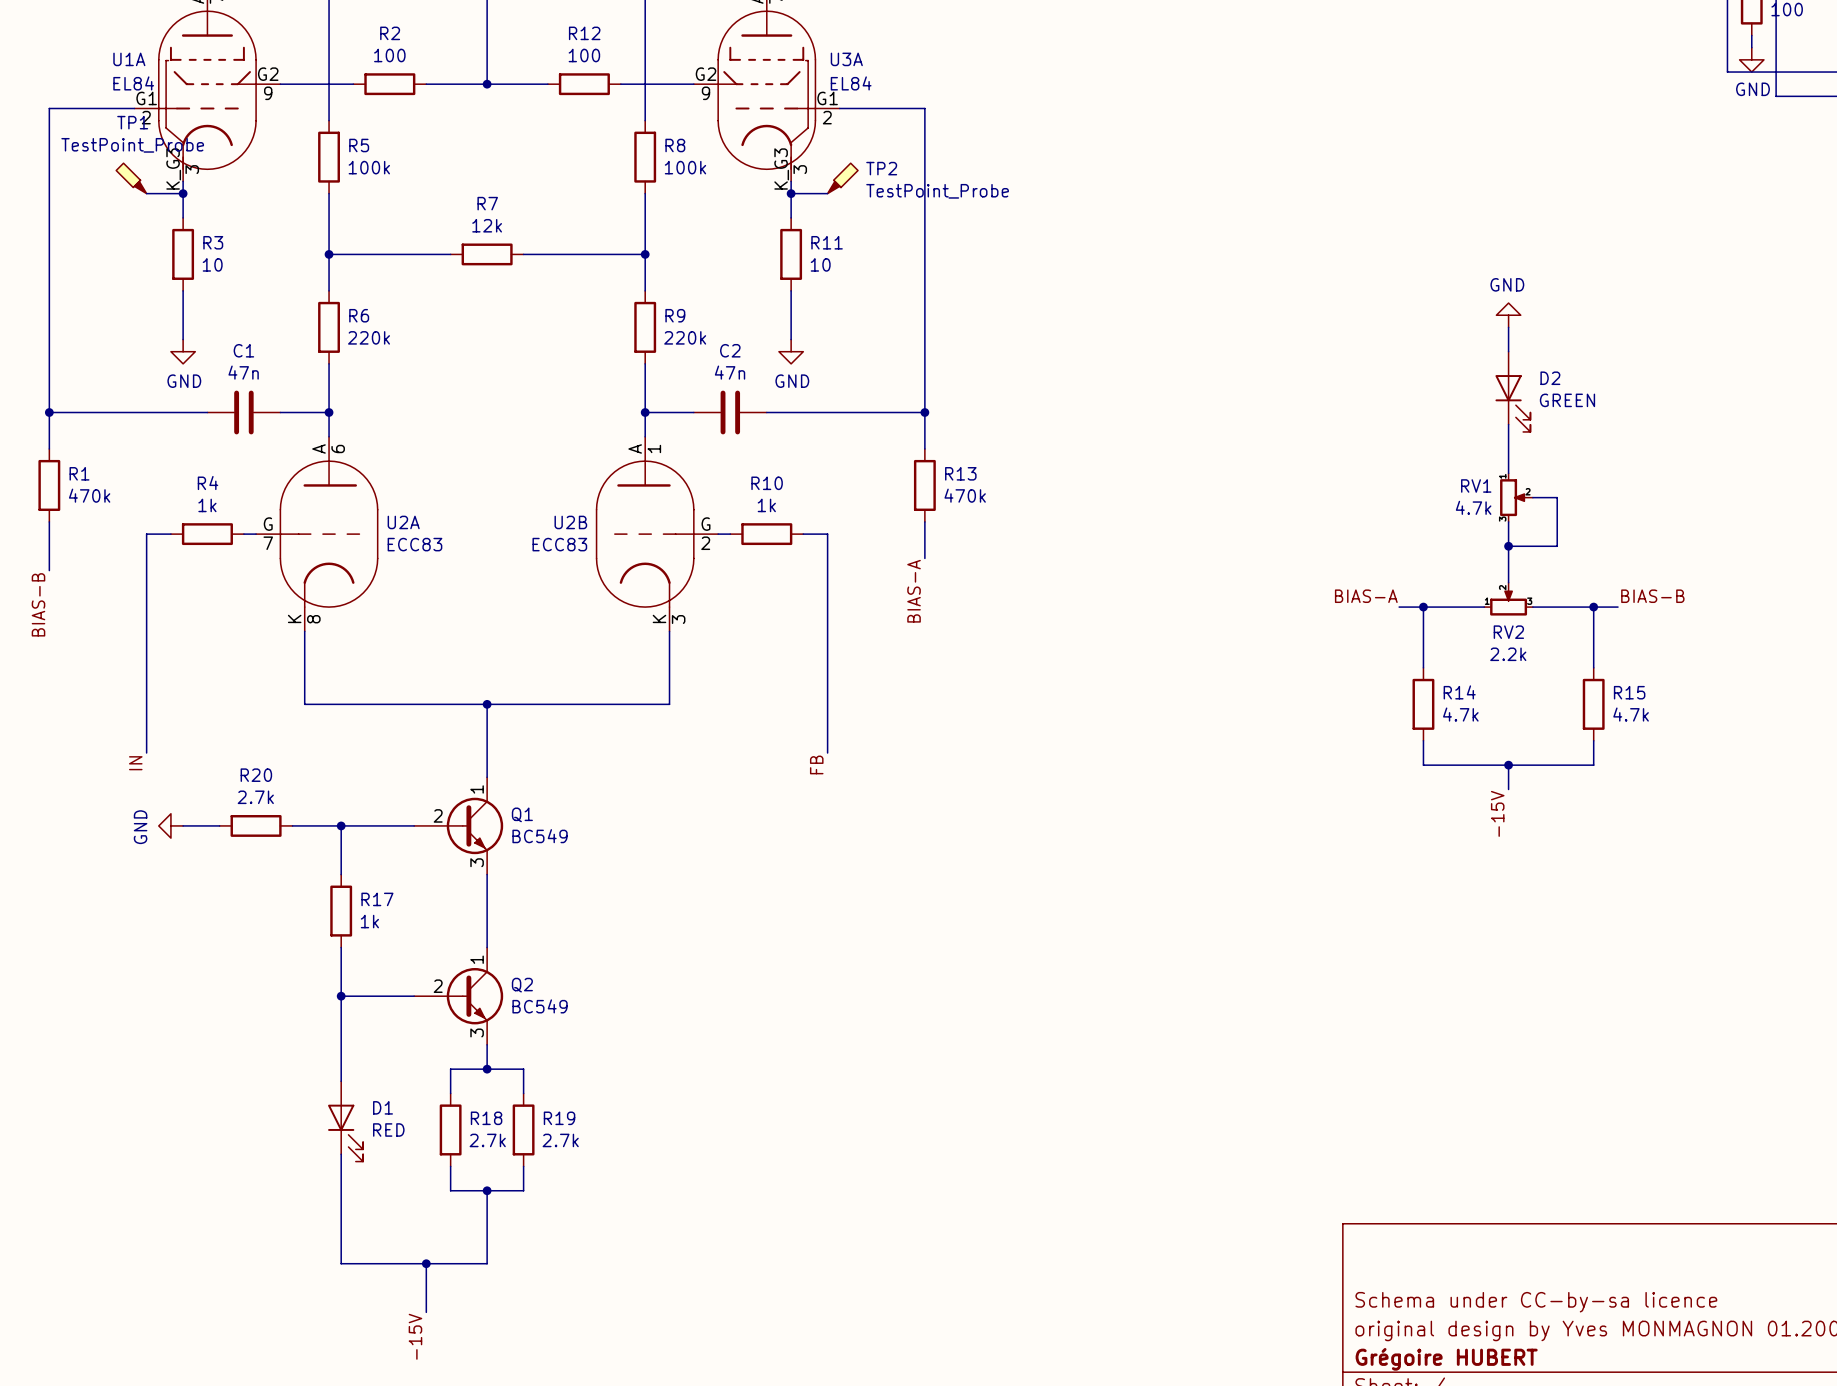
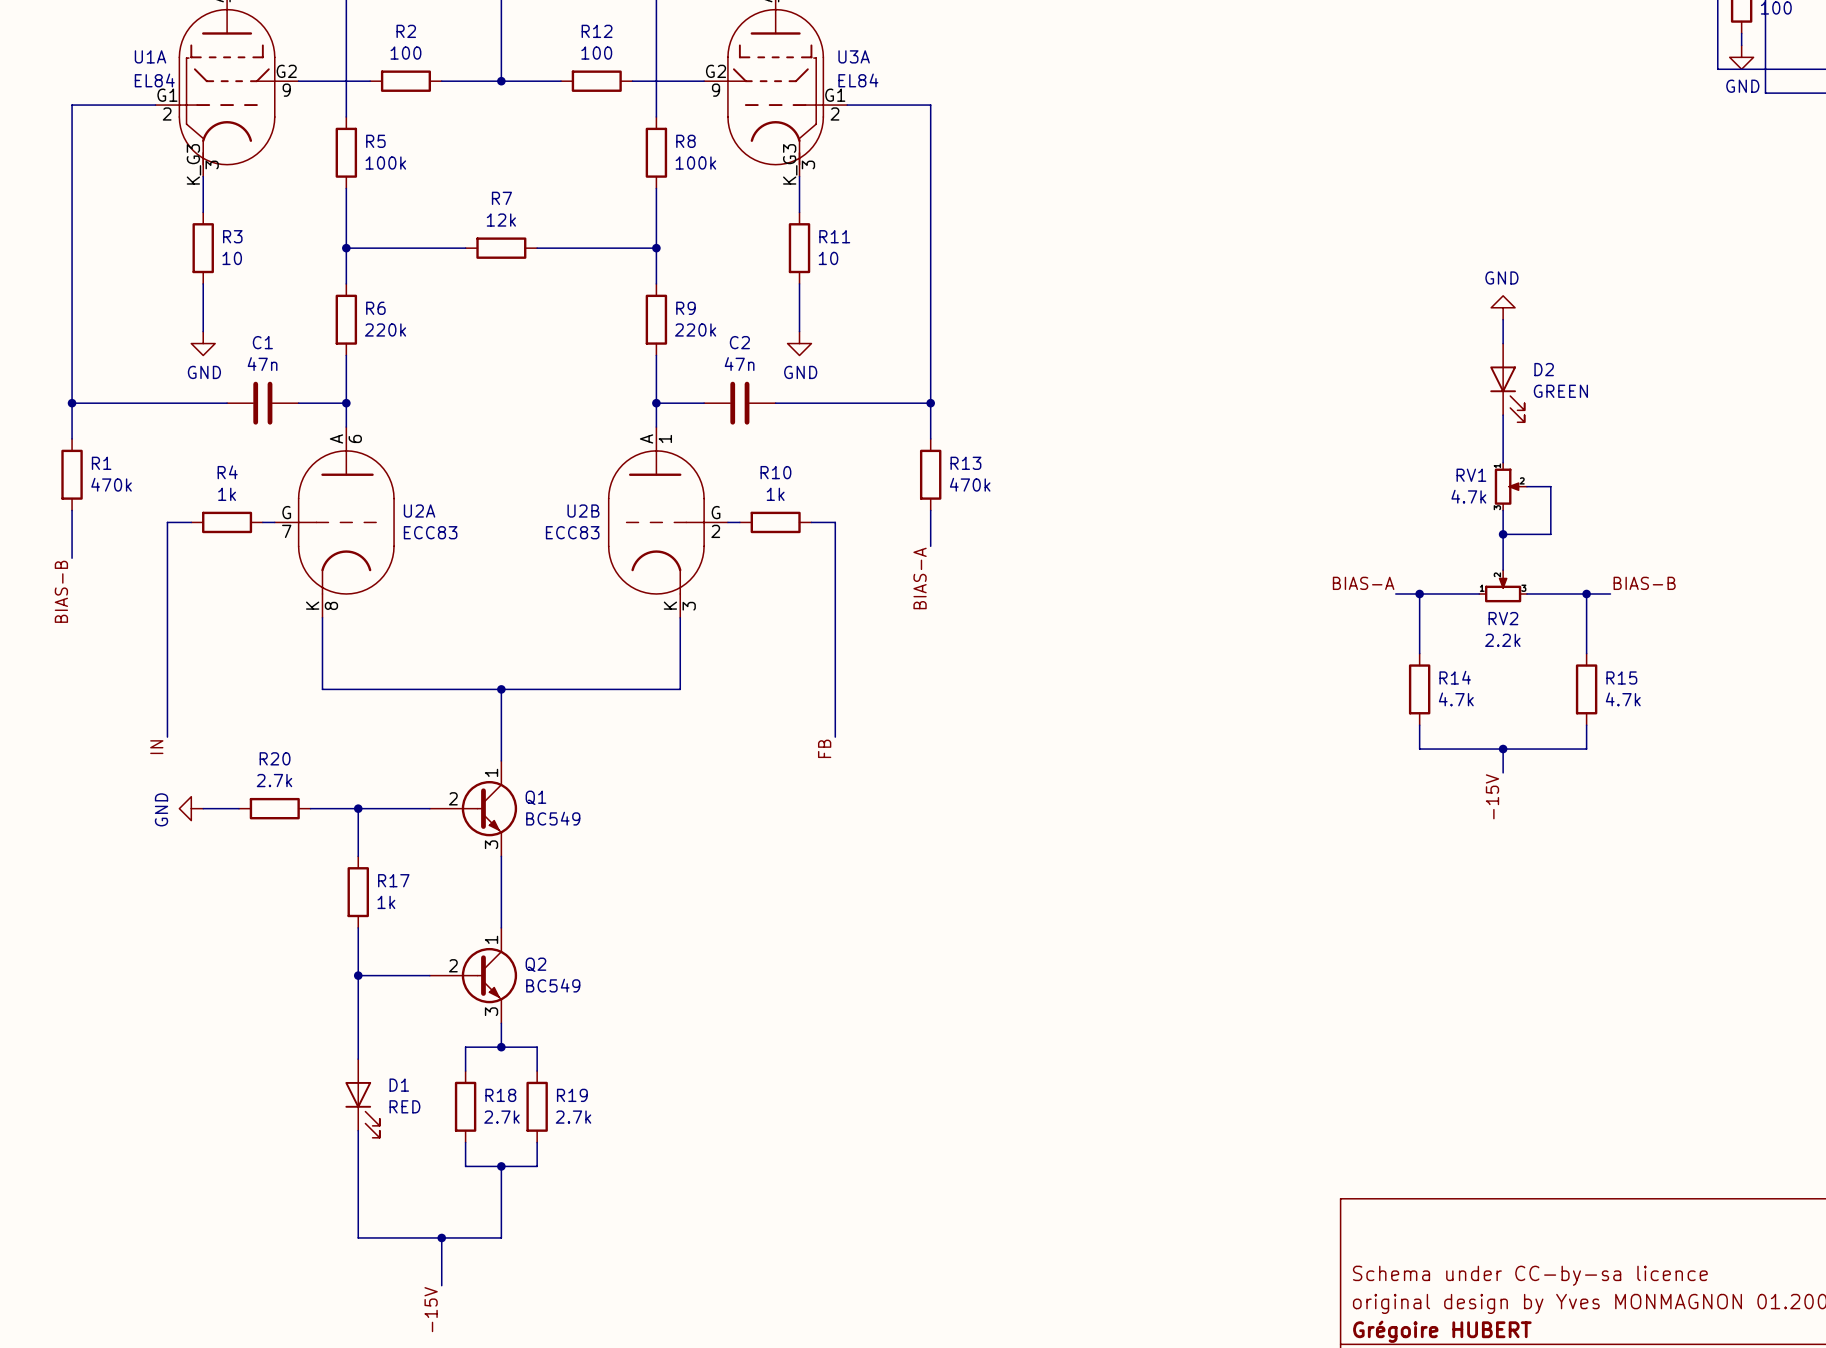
TP1: TestPoint_Probe (131, 178) -> none
TP2: TestPoint_Probe (842, 178) -> none
wire: (146, 193) (183, 193) -> none
junction: (183, 193) -> none
wire: (791, 193) (827, 193) -> none
junction: (791, 193) -> none

